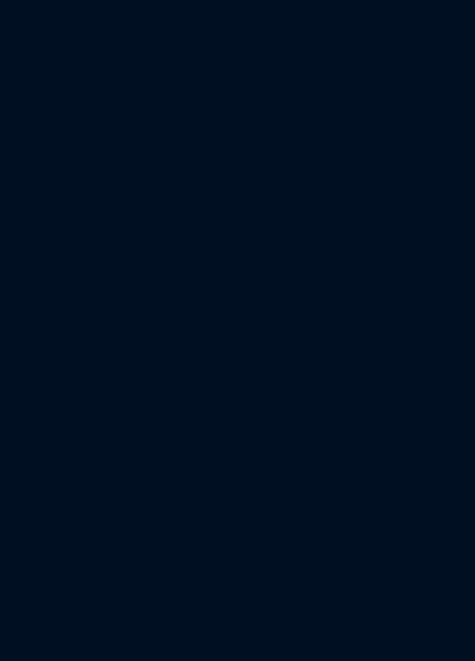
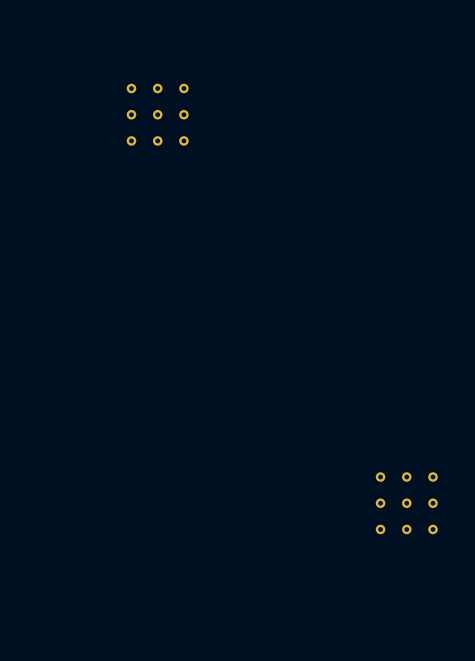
part: none -> (157, 114)
part: none -> (406, 503)

